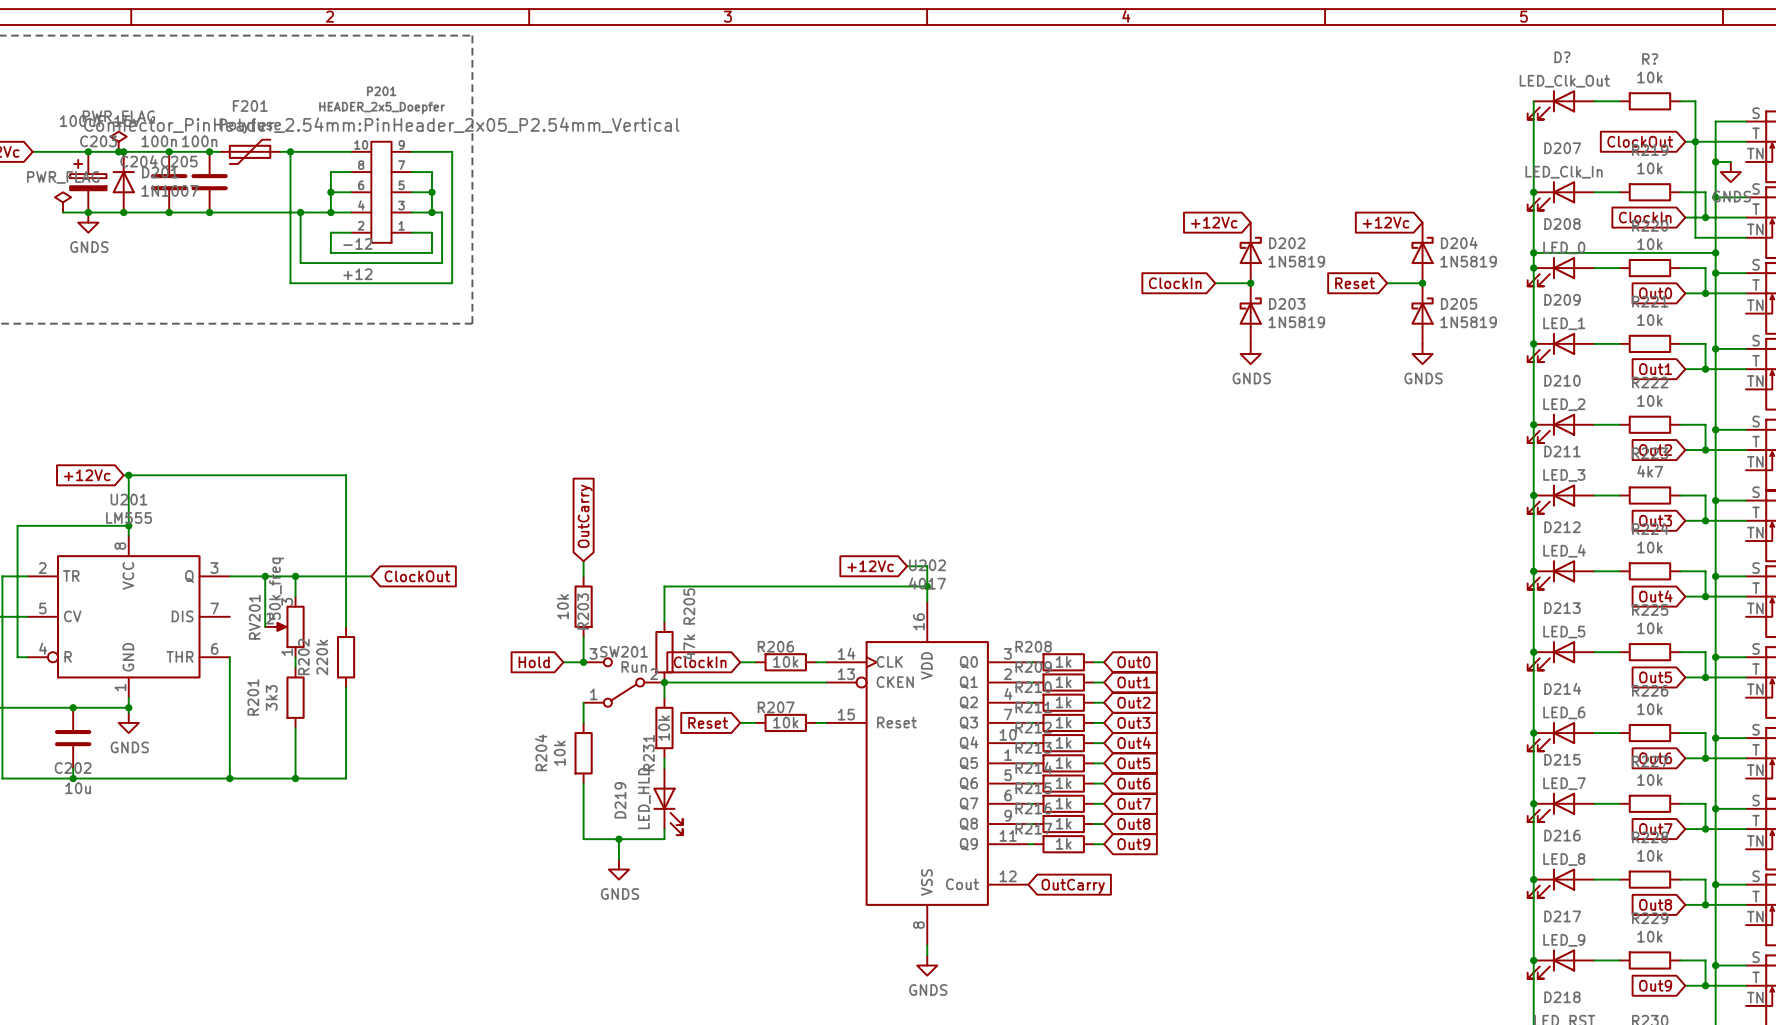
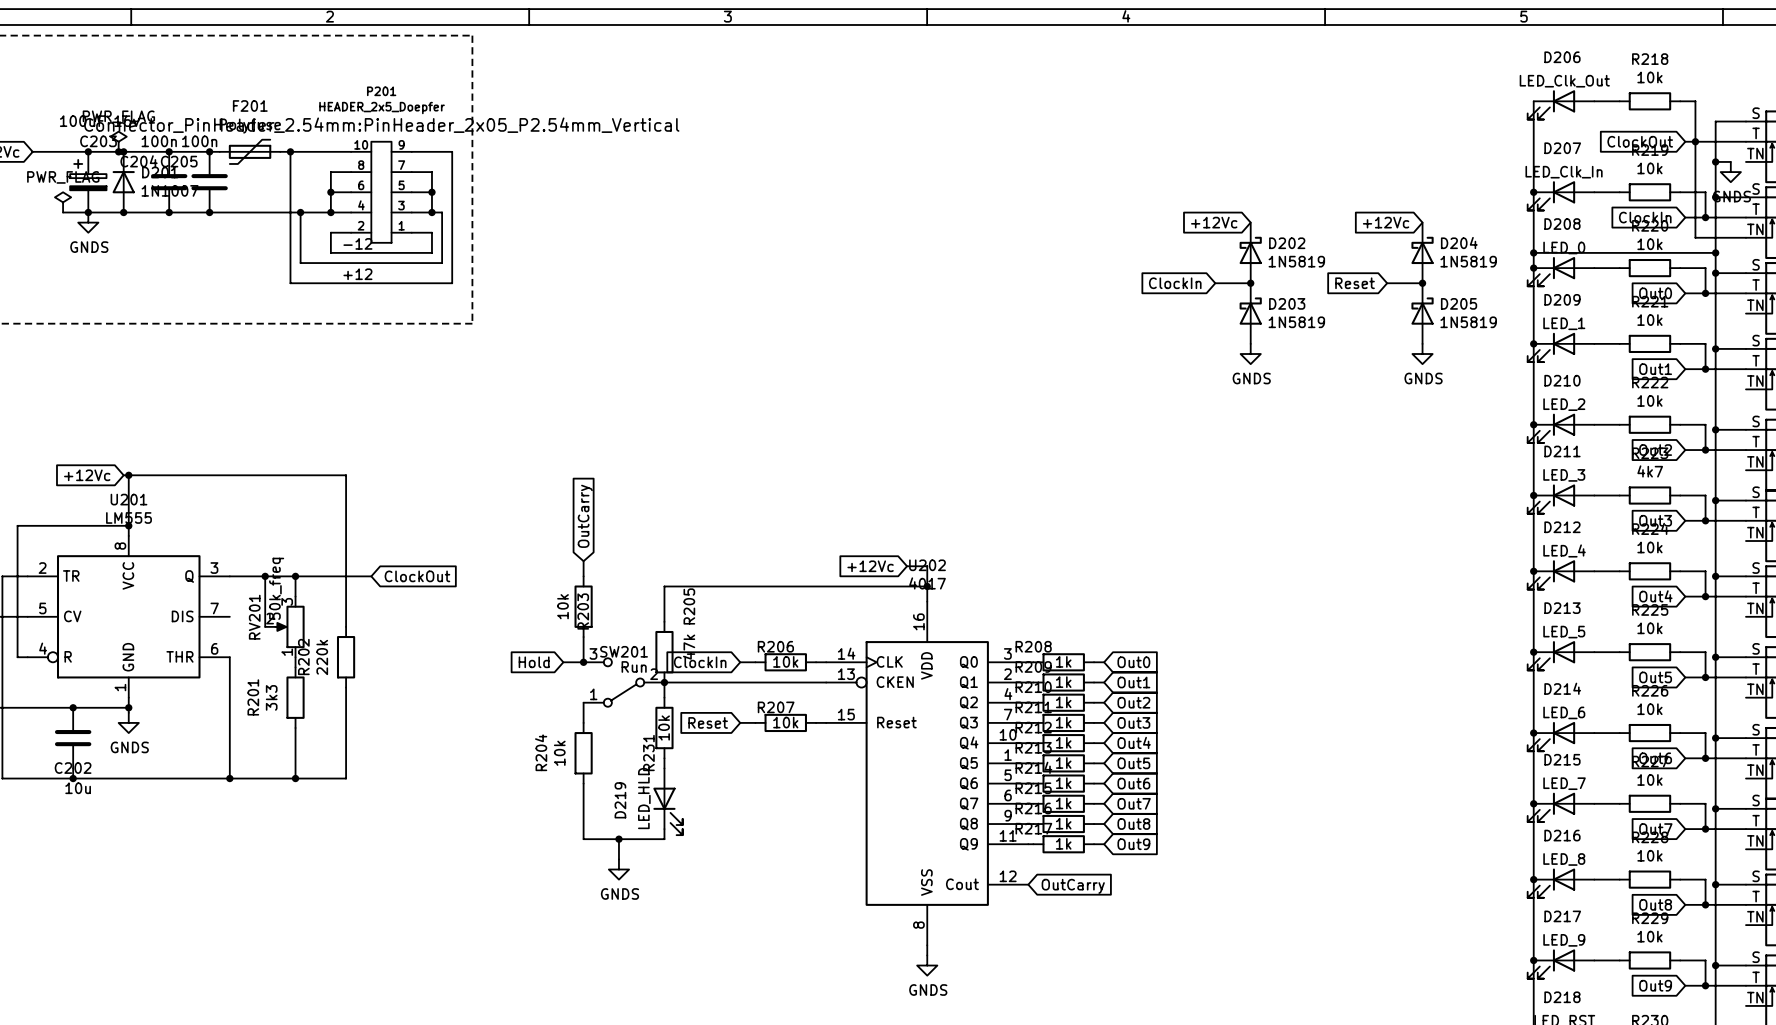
D? name: D? (1562, 57) -> D206 (1562, 57)
R? name: R? (1650, 59) -> R218 (1650, 59)

